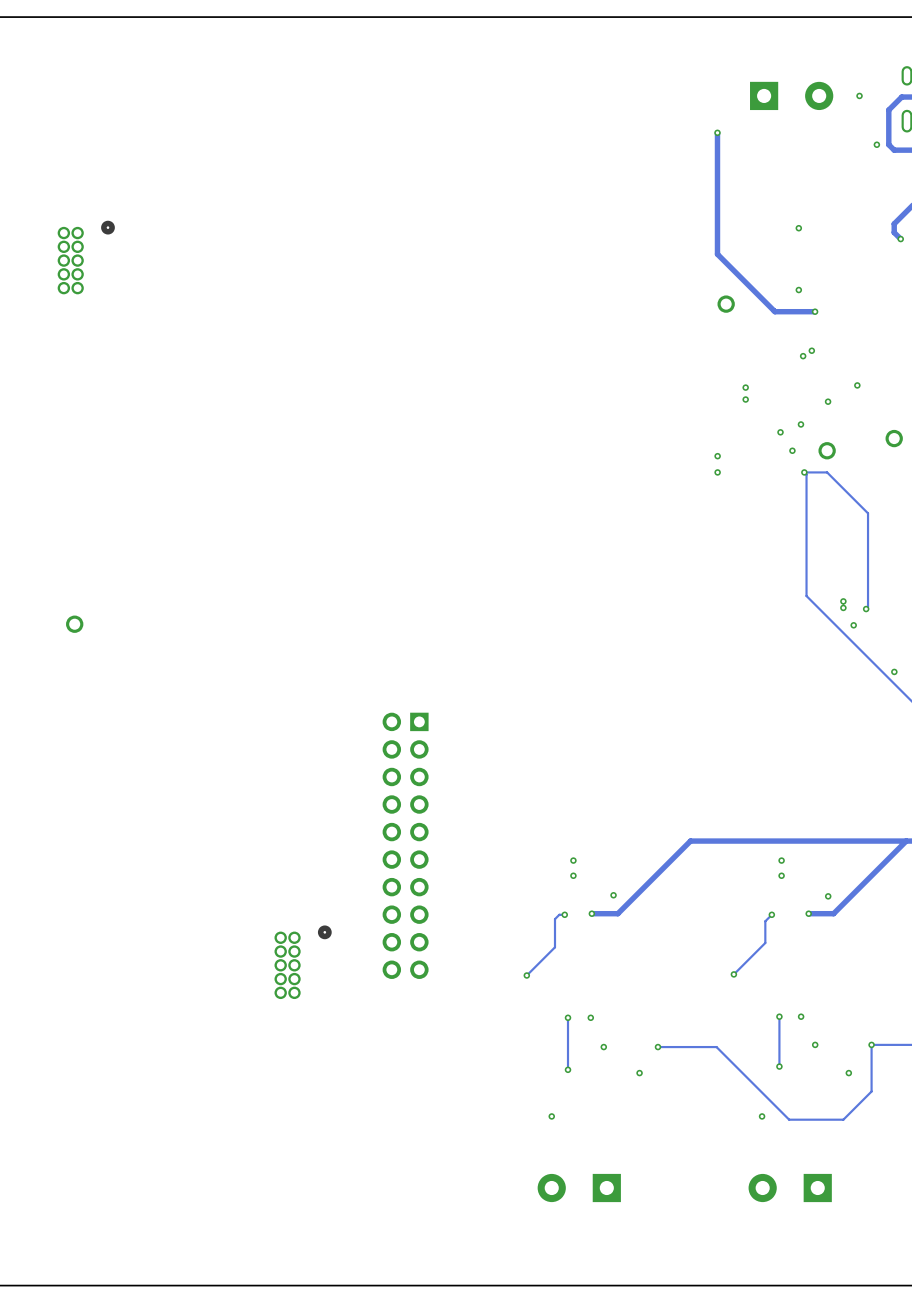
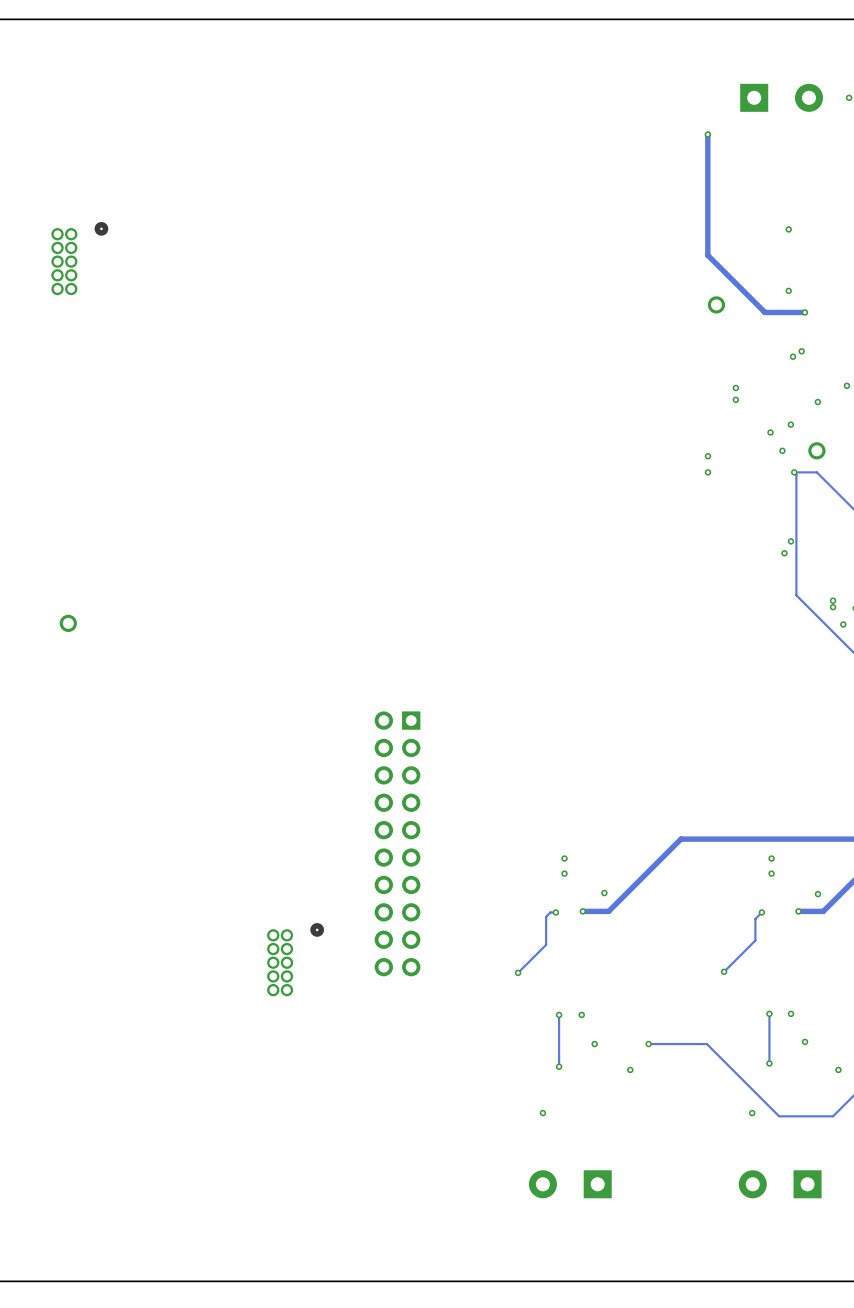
via: none -> (791, 541)
via: none -> (784, 553)

